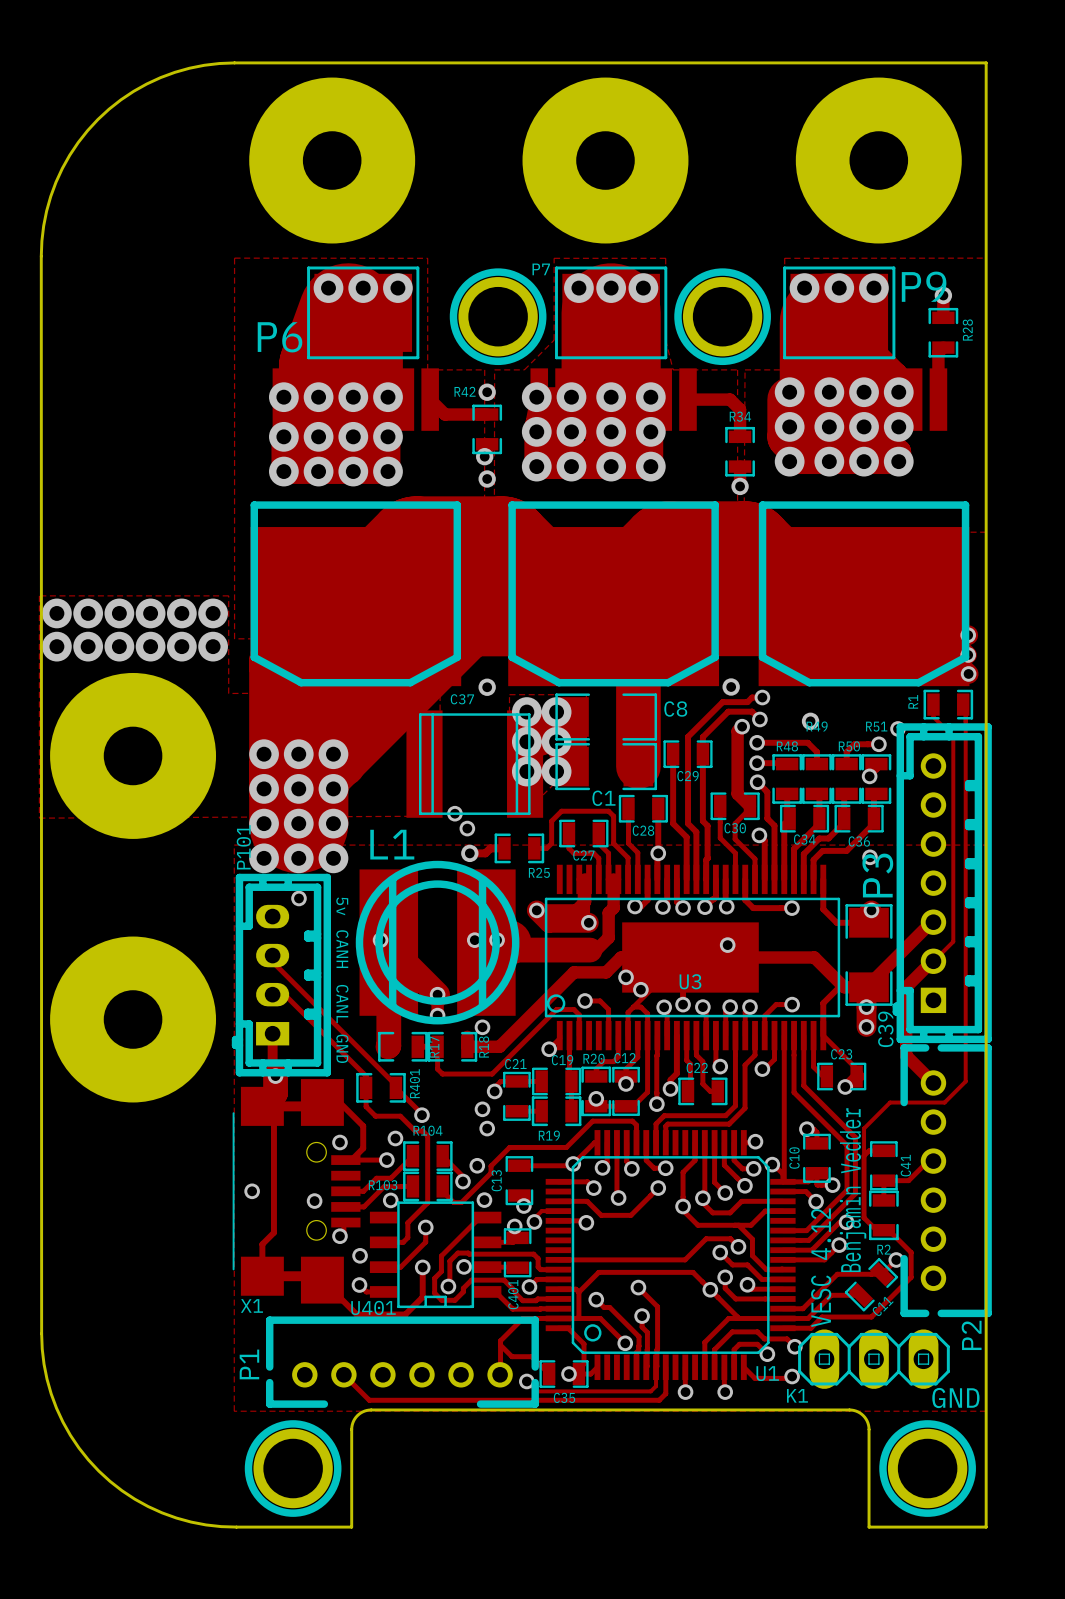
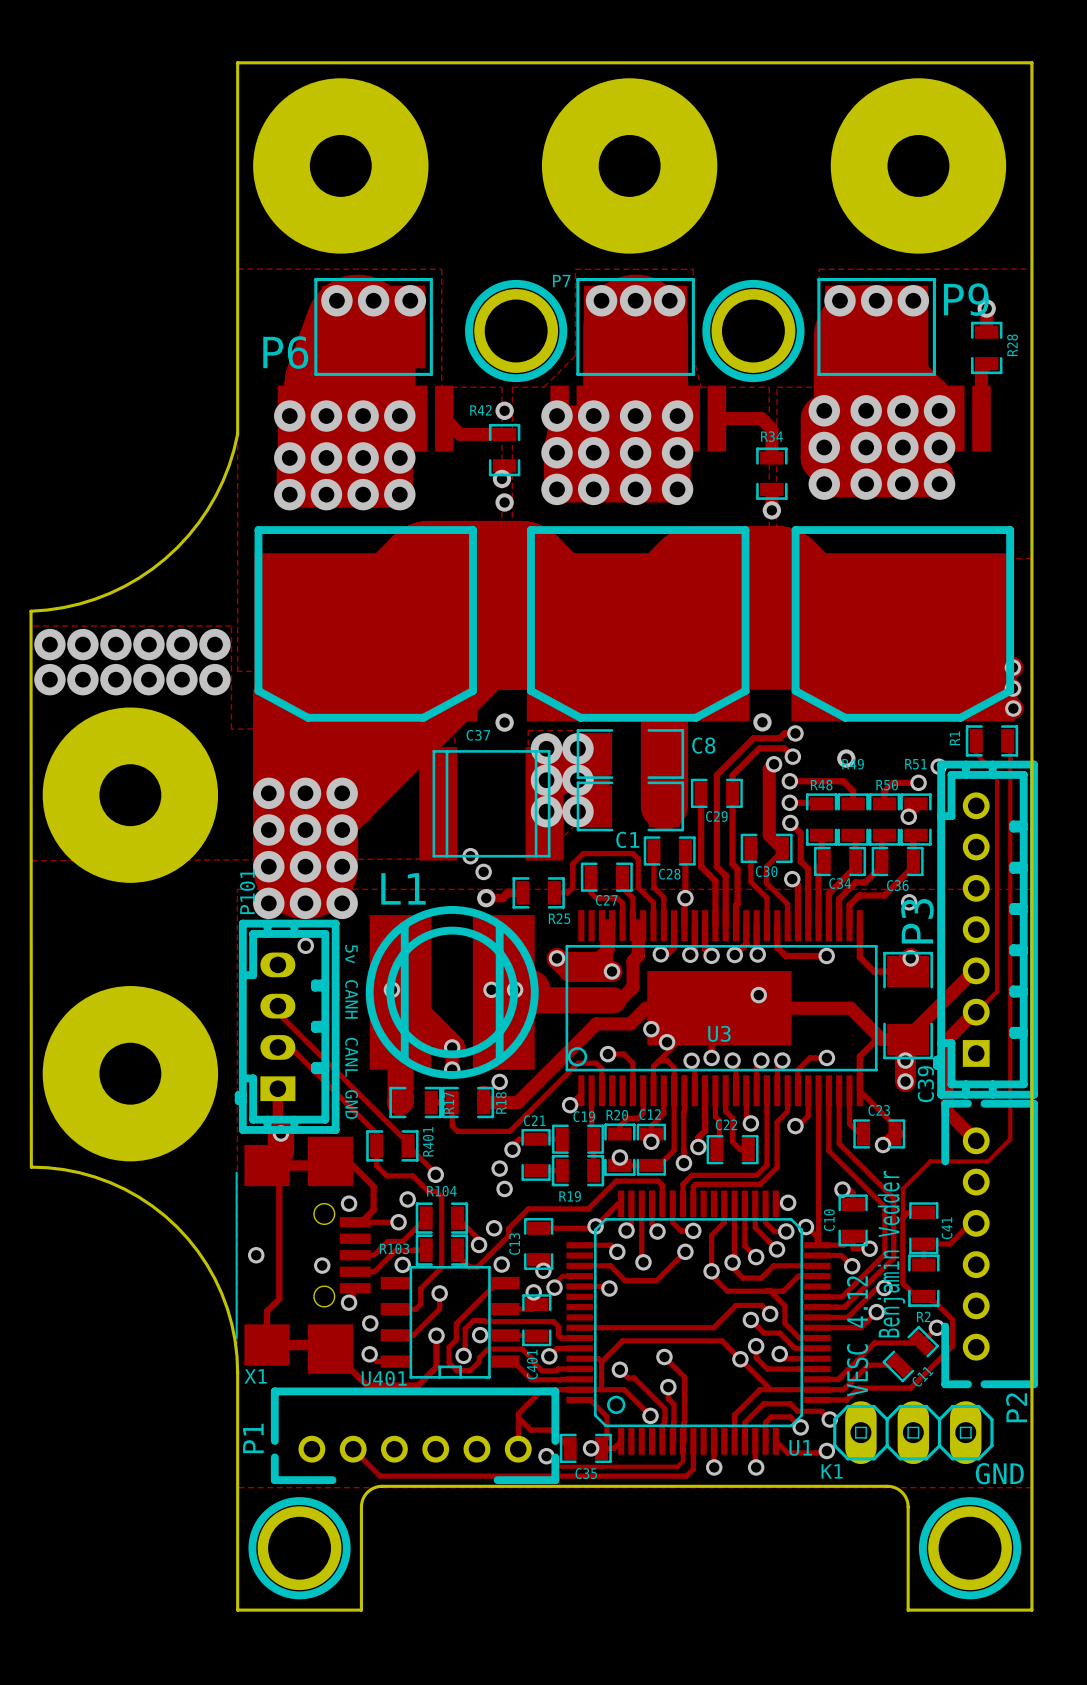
board edge: (234, 62) (189, 68) (160, 77) (133, 91) (109, 109) (87, 130) (69, 155) (56, 182) (43, 225) (41, 256) (41, 1333) (47, 1379) (56, 1408) (78, 1447) (98, 1471) (122, 1490) (162, 1512) (191, 1522) (236, 1527) -> (237, 62) (237, 434) (229, 465) (216, 495) (198, 523) (177, 547) (152, 568) (124, 586) (94, 599) (63, 607) (31, 611) (31, 1167) (79, 1172) (110, 1182) (138, 1197) (165, 1216) (187, 1238) (214, 1278) (231, 1324) (236, 1356) (237, 1610) (239, 1610)

